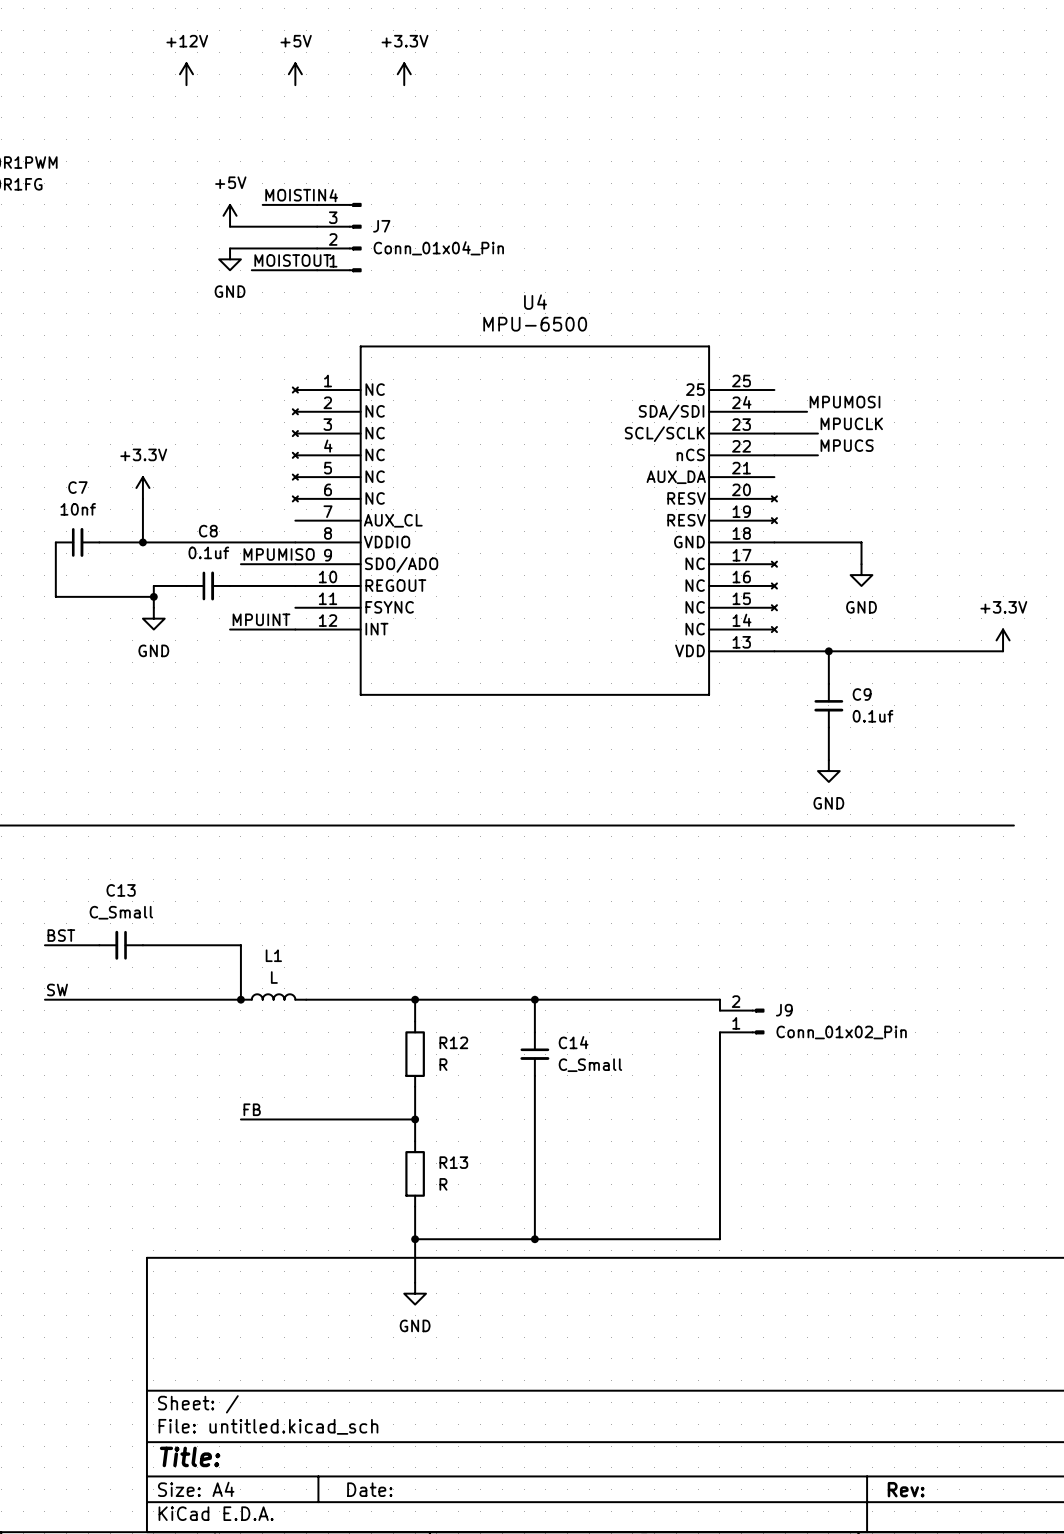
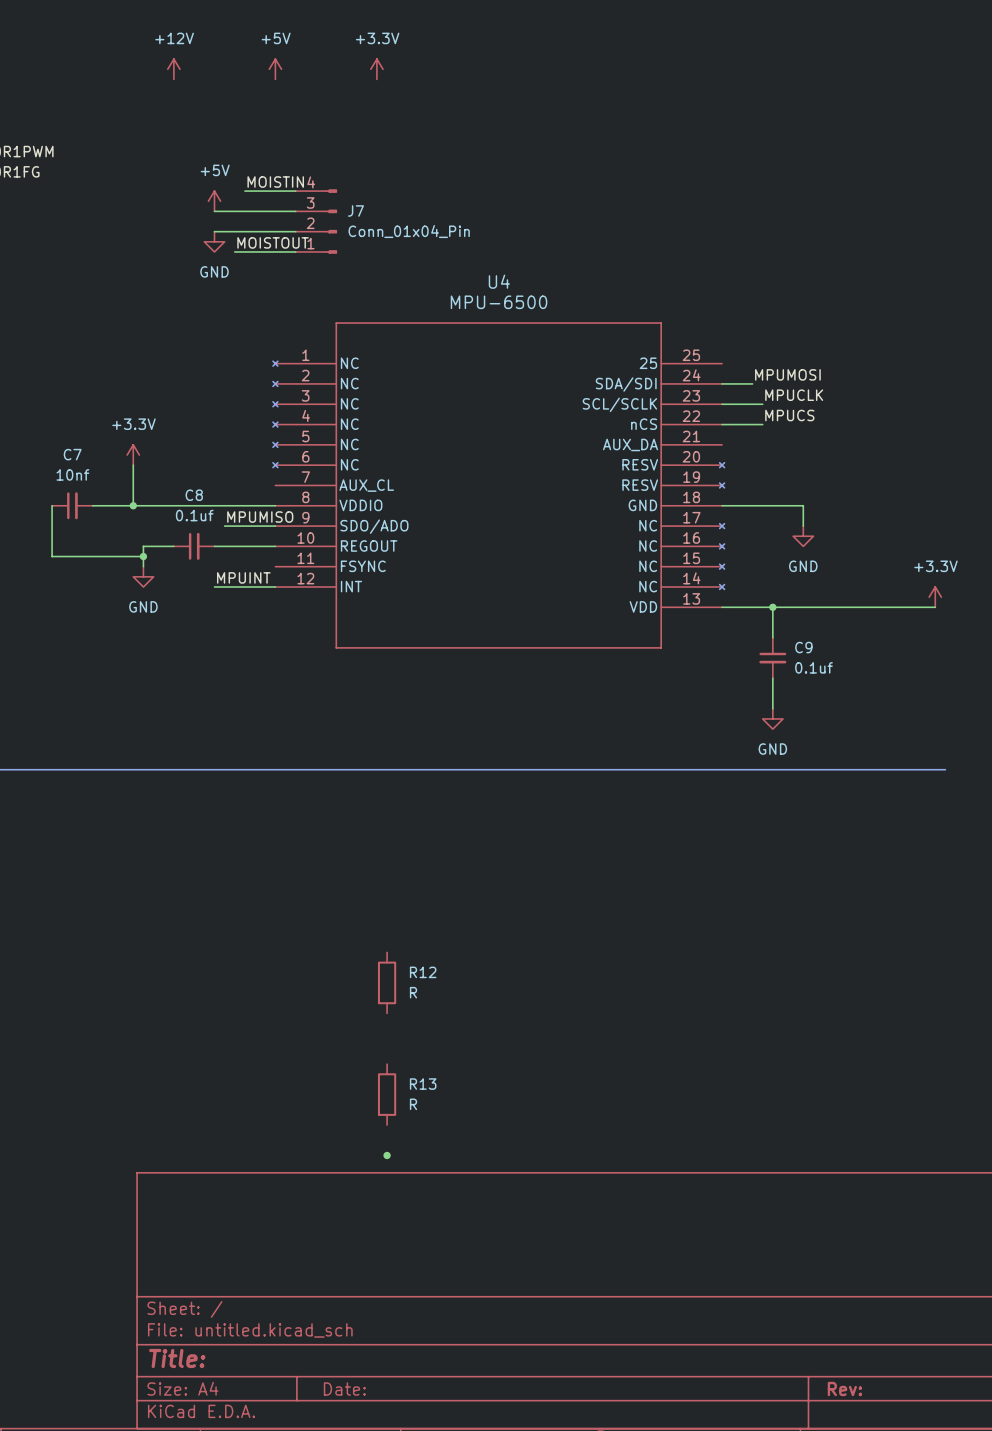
label: BST (61, 935) -> none
wire: (44, 945) (99, 945) -> none
C13: C_Small (121, 945) -> none
wire: (142, 945) (240, 945) (240, 999) (44, 999) -> none
label: SW (57, 989) -> none
L1: L (273, 996) -> none
junction: (240, 999) -> none
wire: (306, 999) (719, 999) (719, 1010) -> none
wire: (415, 999) (415, 1021) -> none
junction: (415, 999) -> none
wire: (534, 999) (534, 1032) -> none
junction: (534, 999) -> none
J9: Conn_01x02_Pin (742, 1021) -> none
wire: (719, 1032) (719, 1239) (415, 1239) -> none
C14: C_Small (534, 1054) -> none
wire: (534, 1075) (534, 1239) -> none
wire: (415, 1086) (415, 1141) -> none
label: FB (252, 1109) -> none
wire: (240, 1119) (415, 1119) -> none
junction: (415, 1119) -> none
wire: (415, 1206) (415, 1282) -> none
junction: (534, 1239) -> none
power symbol: GND (415, 1293) -> none

